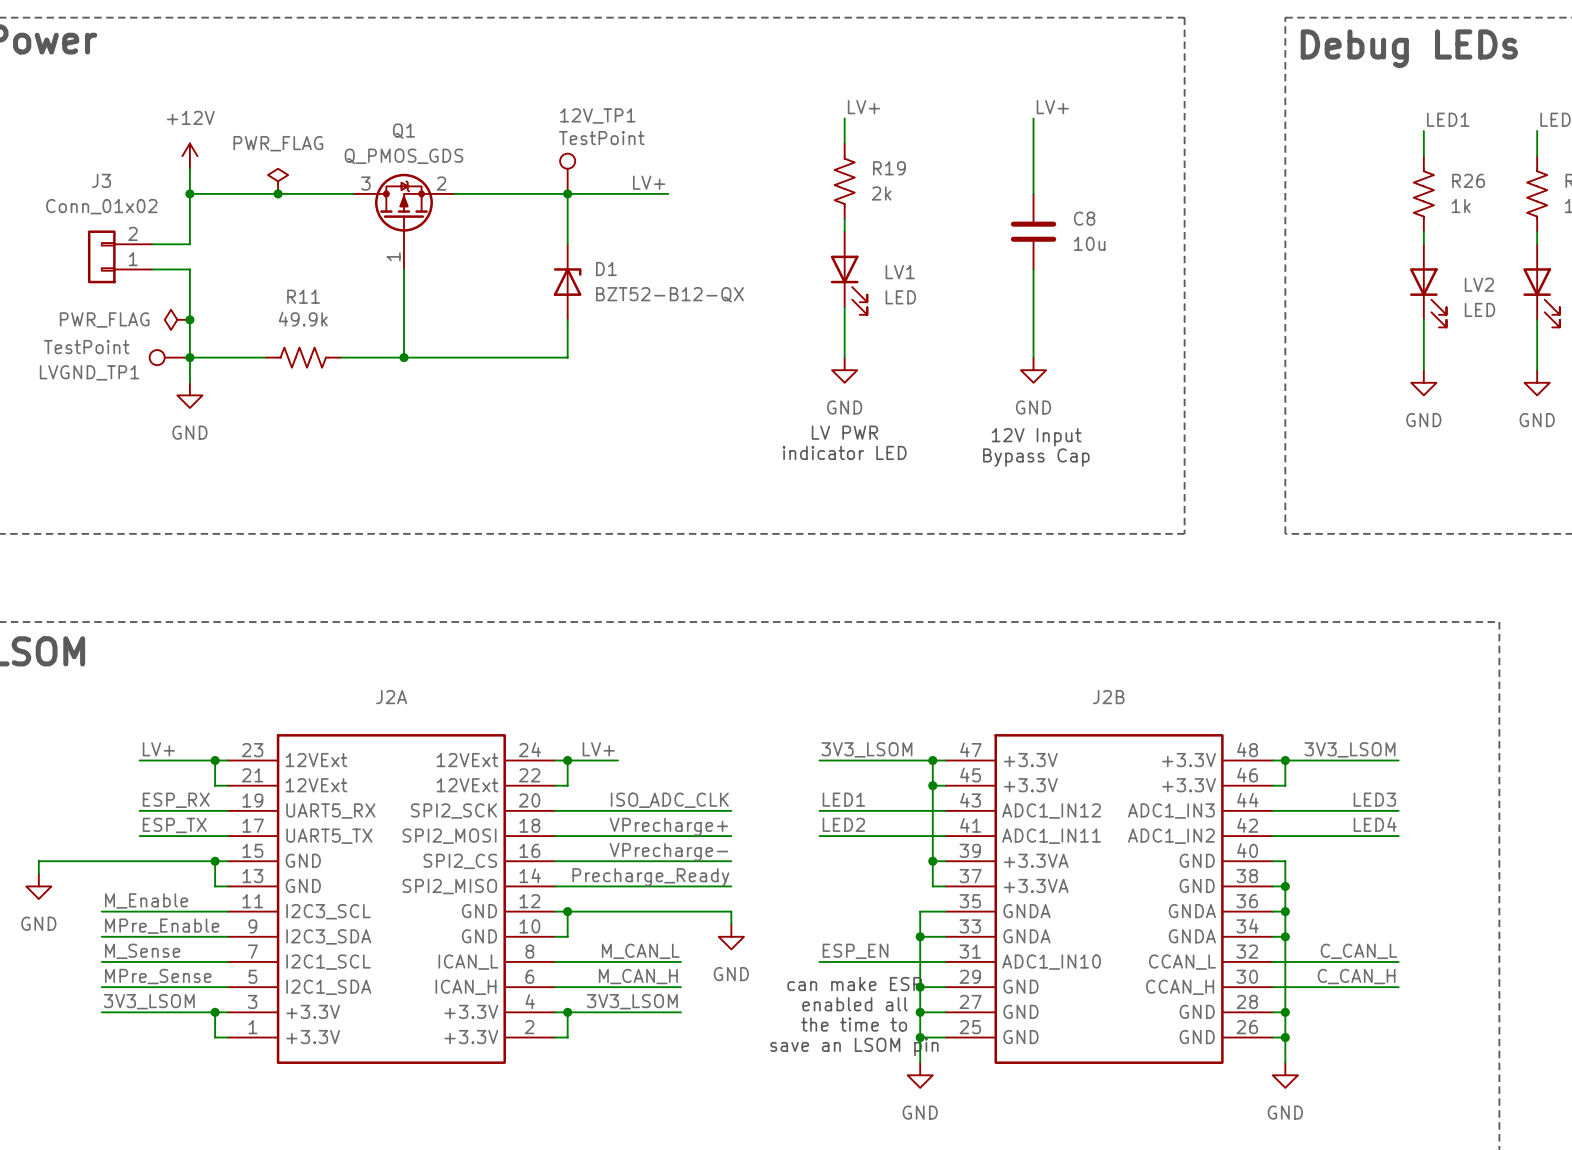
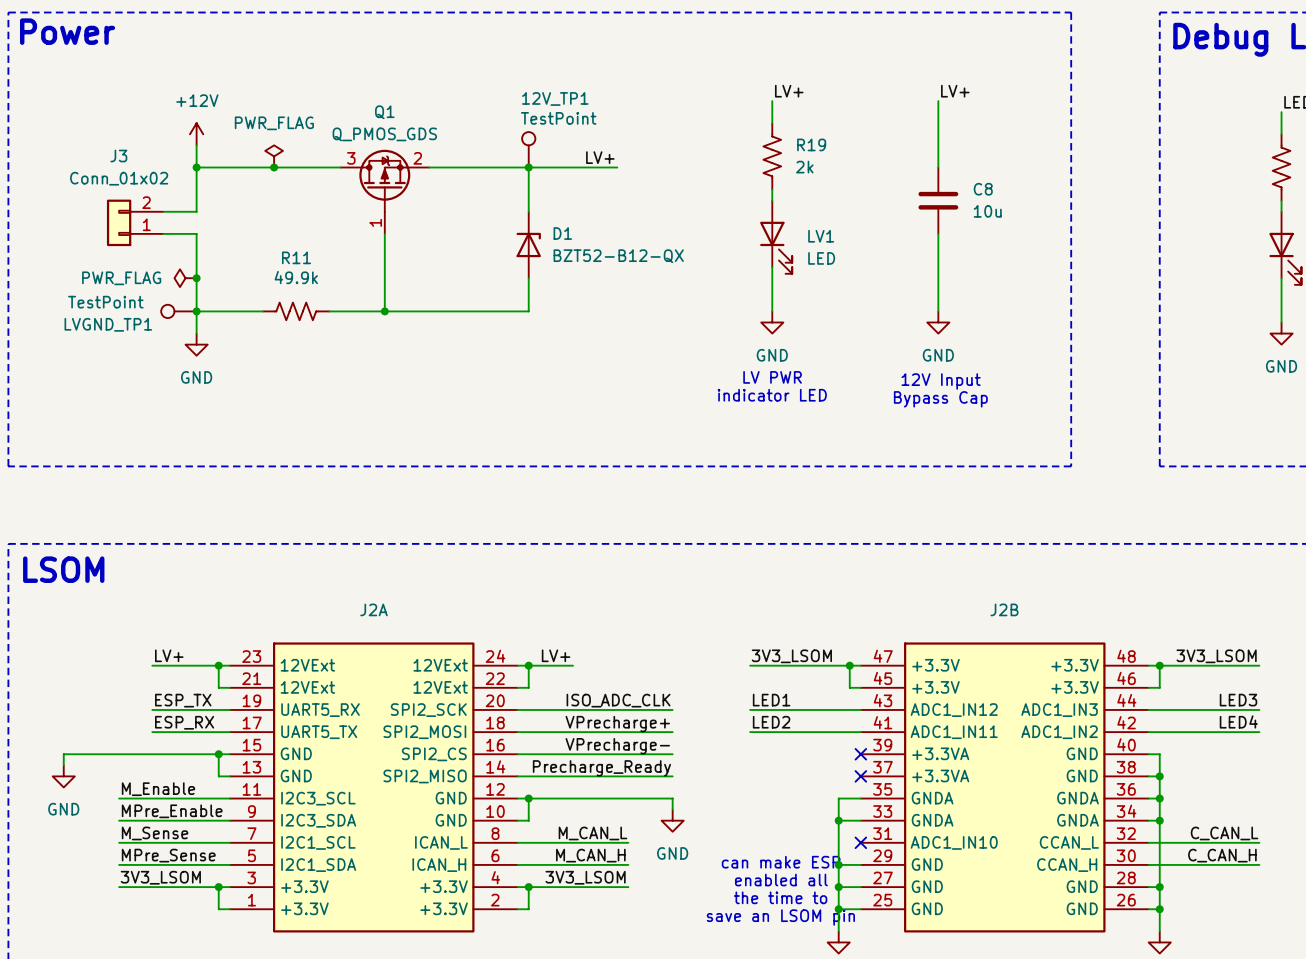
wire: (932, 785) (932, 886) (945, 886) -> none
junction: (932, 785) -> none
label: ESP_RX (176, 800) -> ESP_TX (183, 700)
label: ESP_TX (174, 825) -> ESP_RX (184, 722)
wire: (932, 861) (945, 861) -> none
junction: (932, 861) -> none
no-connect mark: none -> (860, 754)
no-connect mark: none -> (860, 776)
label: ESP_EN (855, 951) -> none
wire: (819, 961) (945, 961) -> none
no-connect mark: none -> (860, 842)

